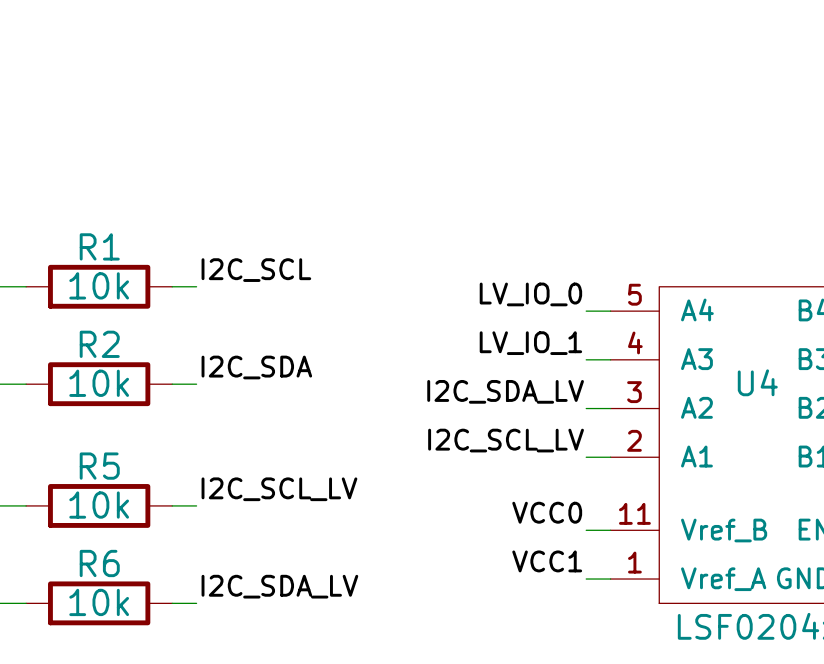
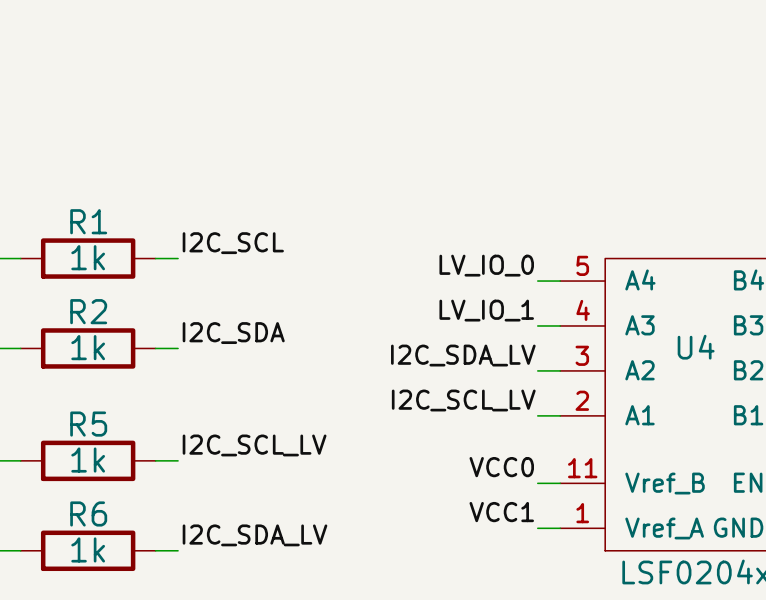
R1 value: 10k (99, 285) -> 1k (88, 257)
R2 value: 10k (99, 383) -> 1k (88, 347)
R5 value: 10k (99, 505) -> 1k (88, 460)
R6 value: 10k (99, 602) -> 1k (88, 549)

